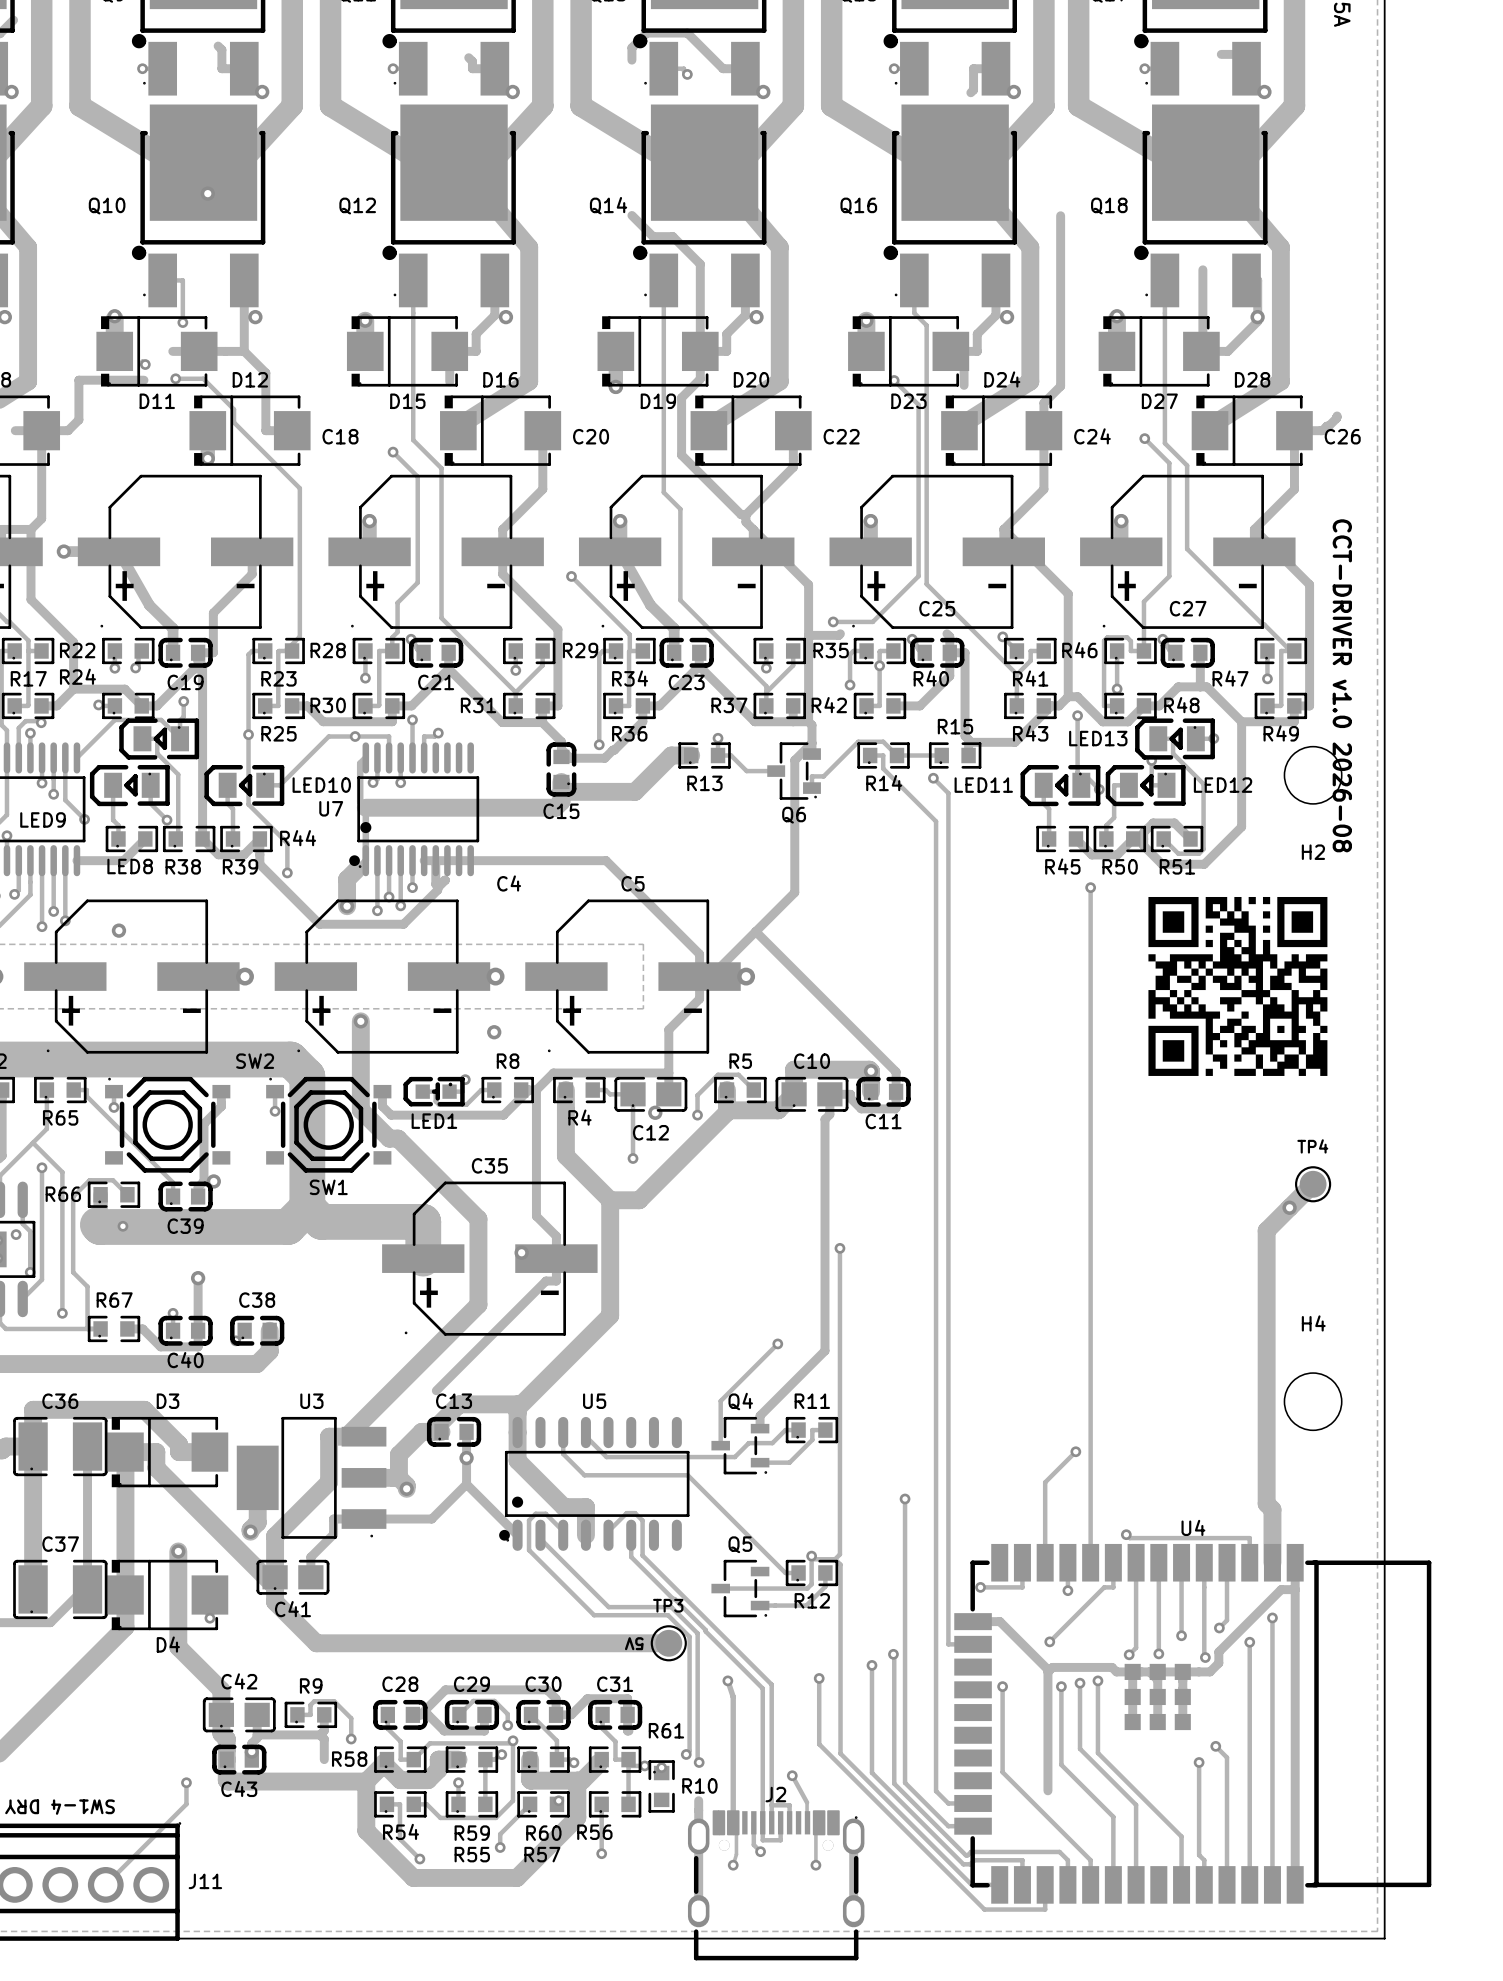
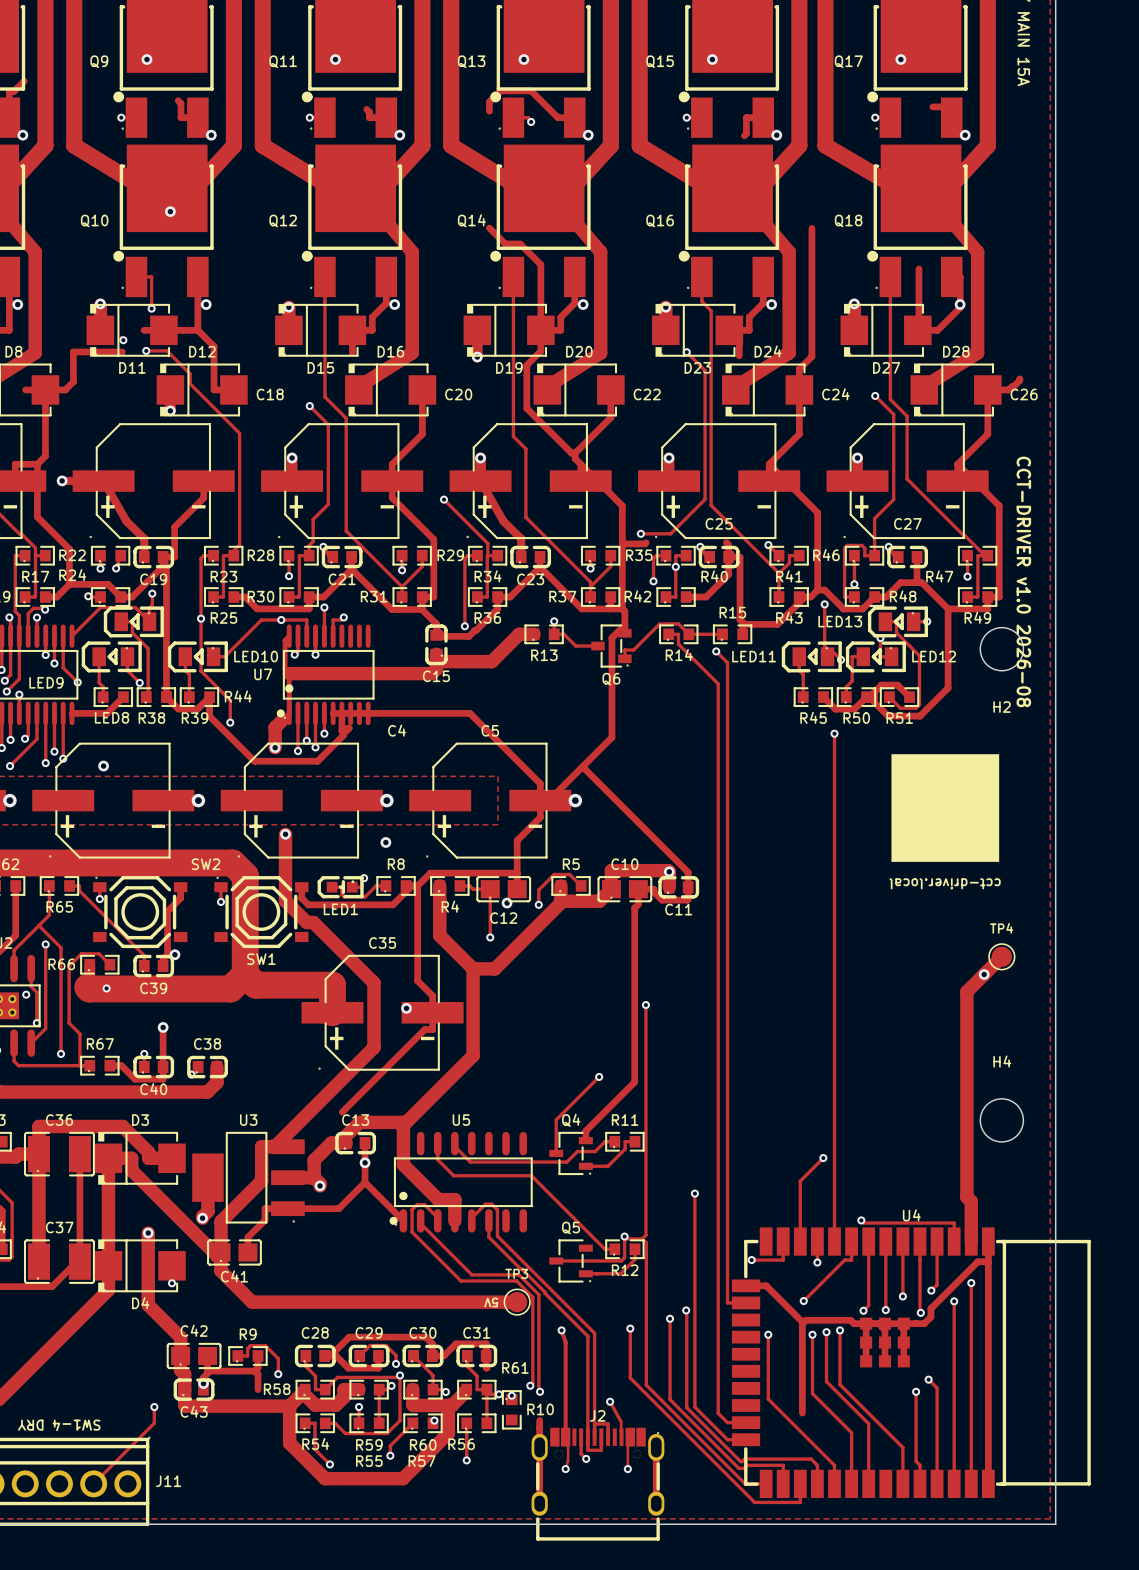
drawing: [1148, 896, 1328, 1076] -> none
drawing: none -> [891, 754, 1000, 862]
text: none -> cct-driver.local (945, 883)

